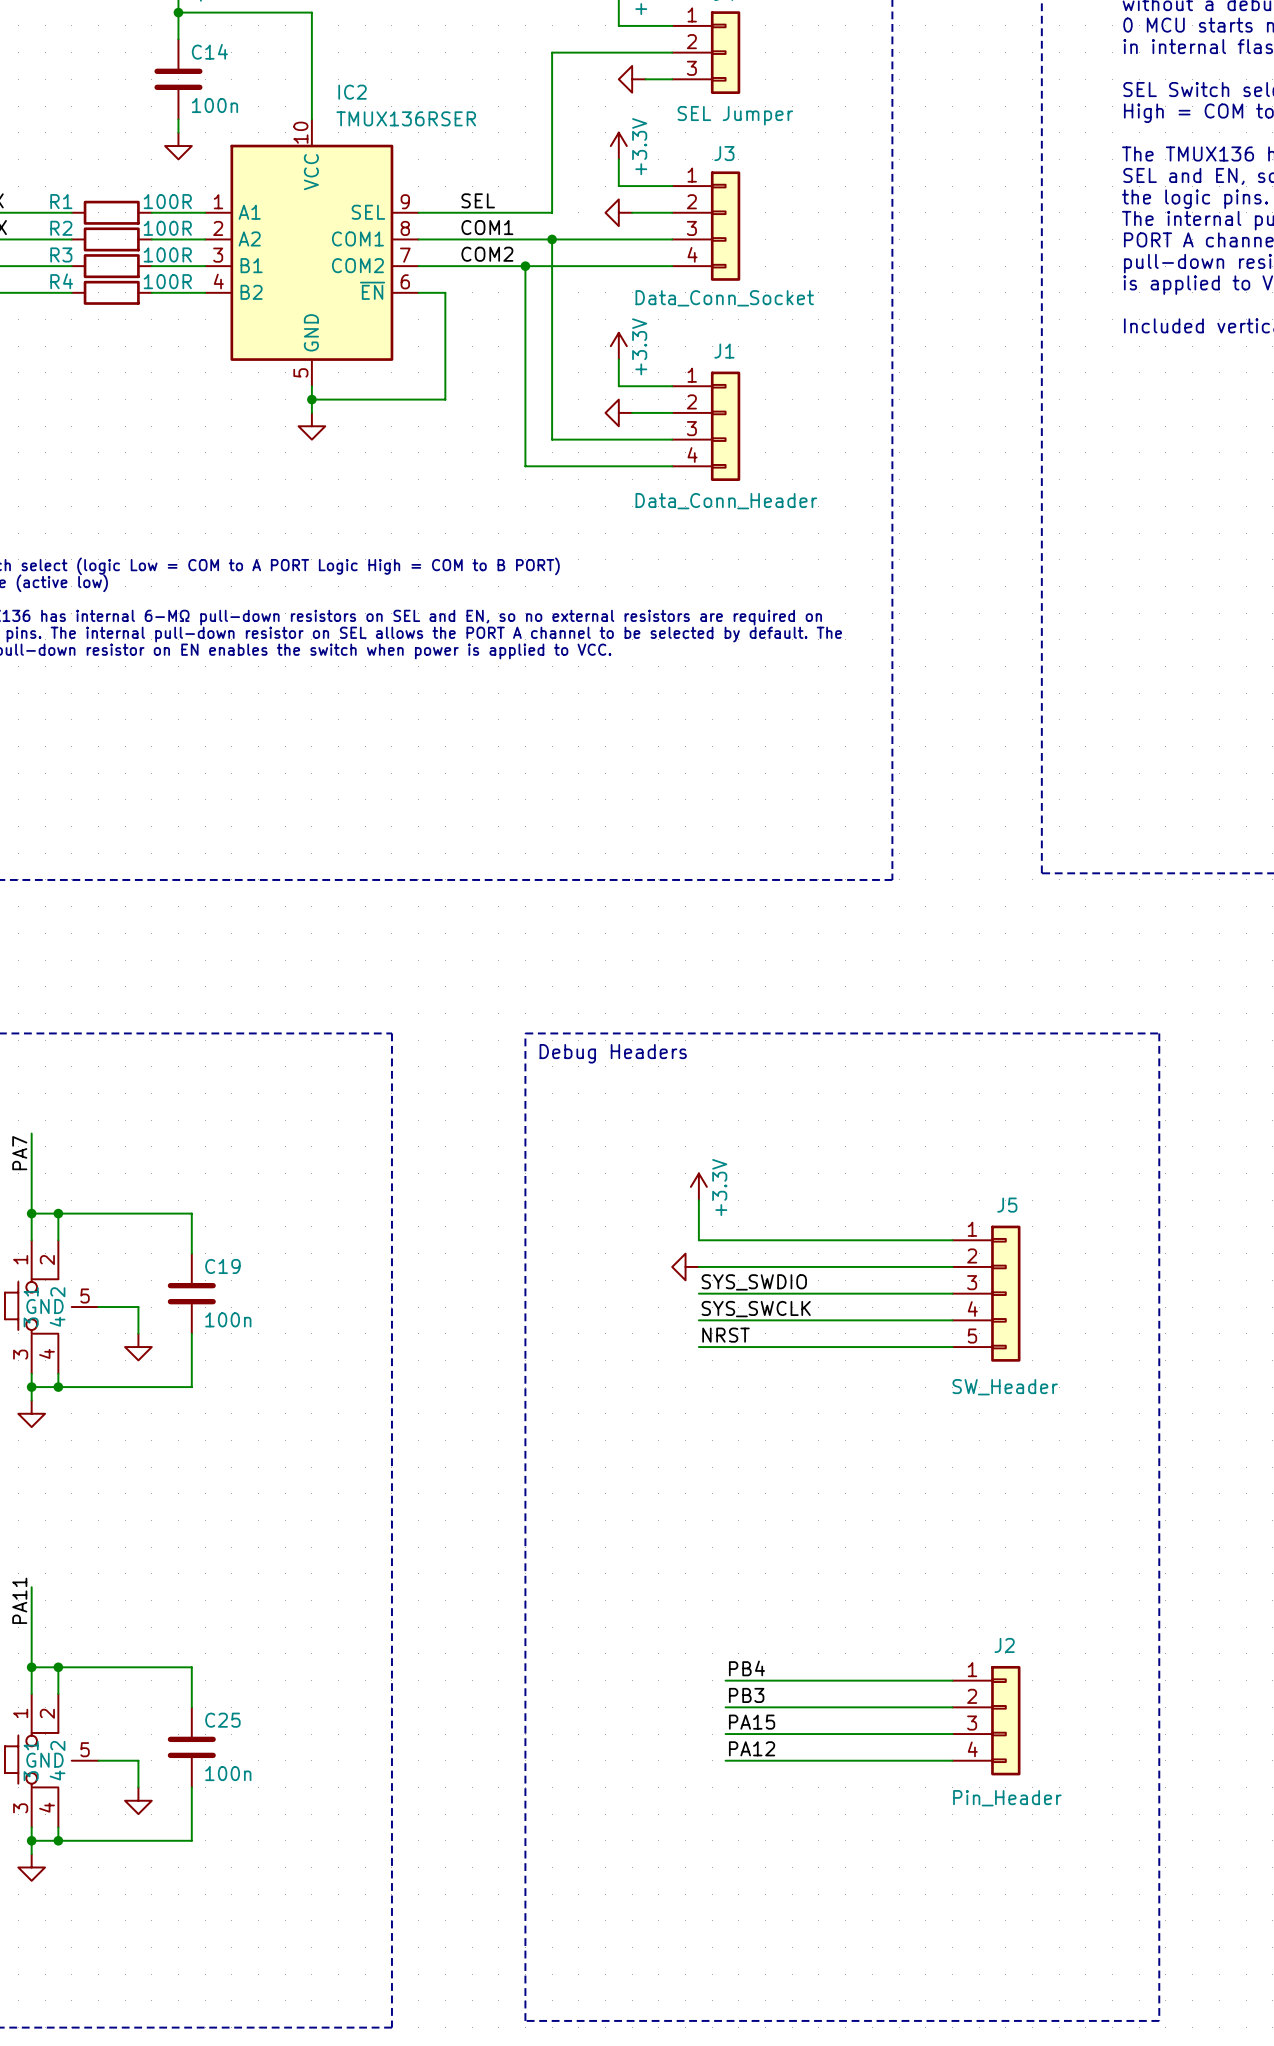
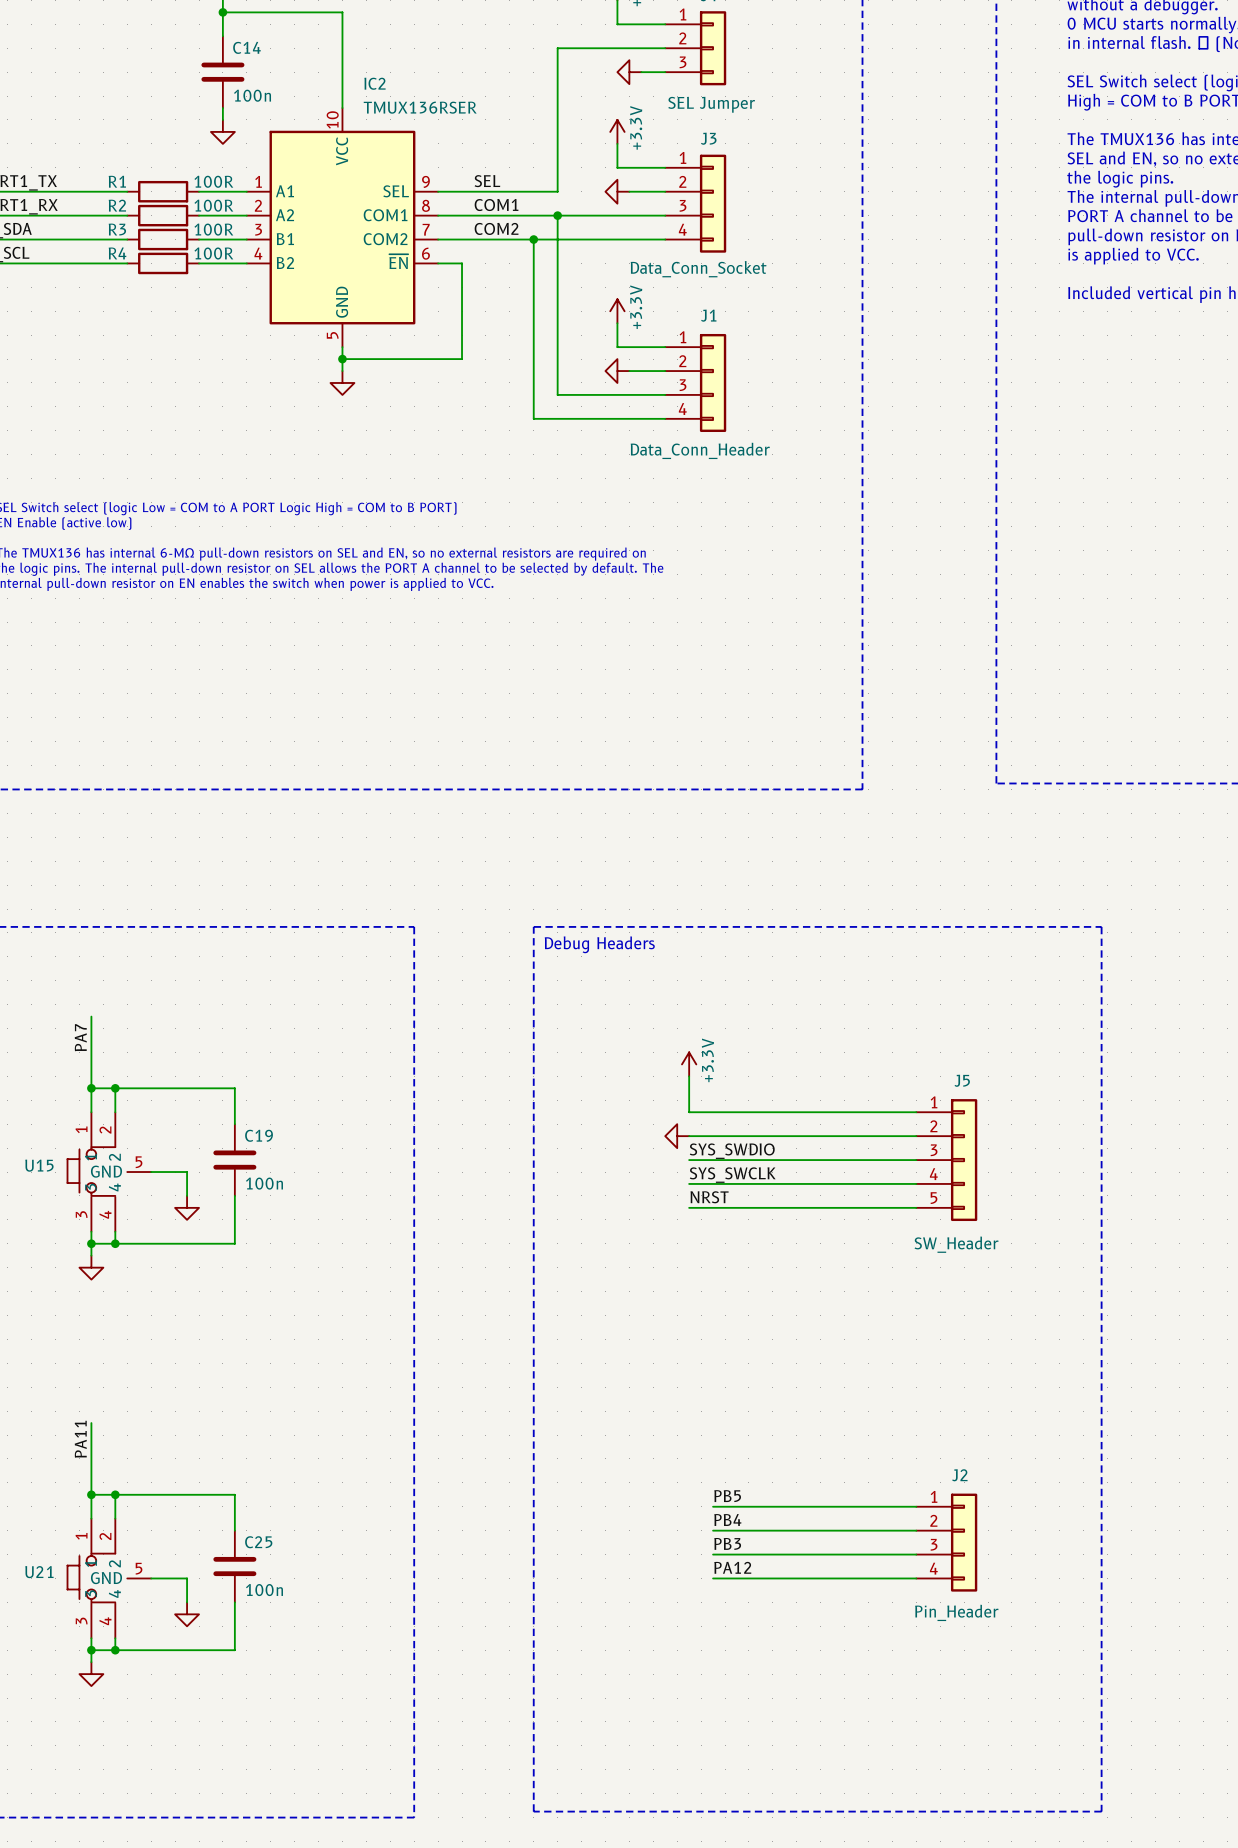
label: PB4 (746, 1668) -> PB5 (727, 1496)
label: PB3 (746, 1695) -> PB4 (727, 1519)
label: PA15 (752, 1722) -> PB3 (727, 1543)

